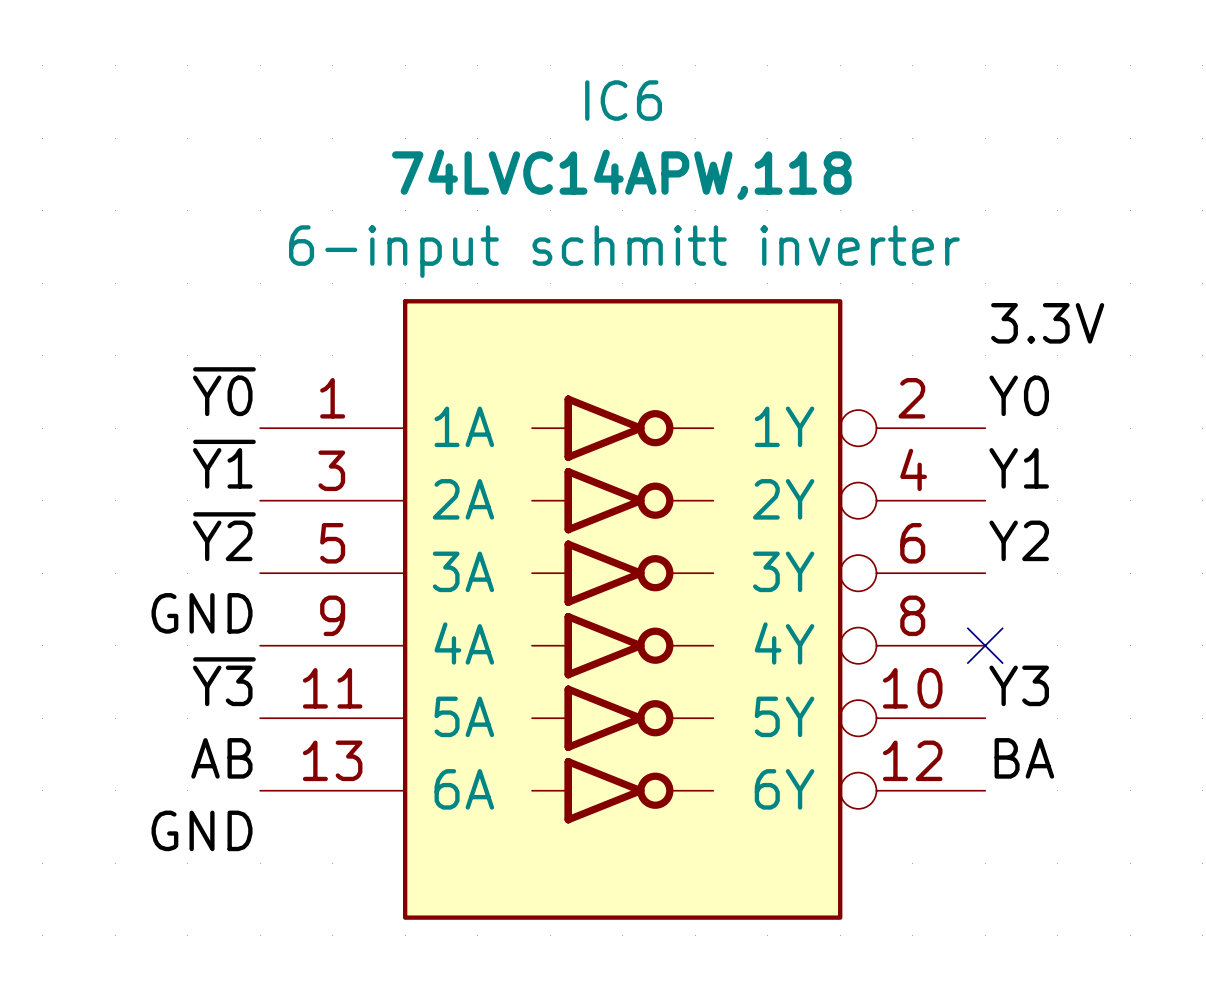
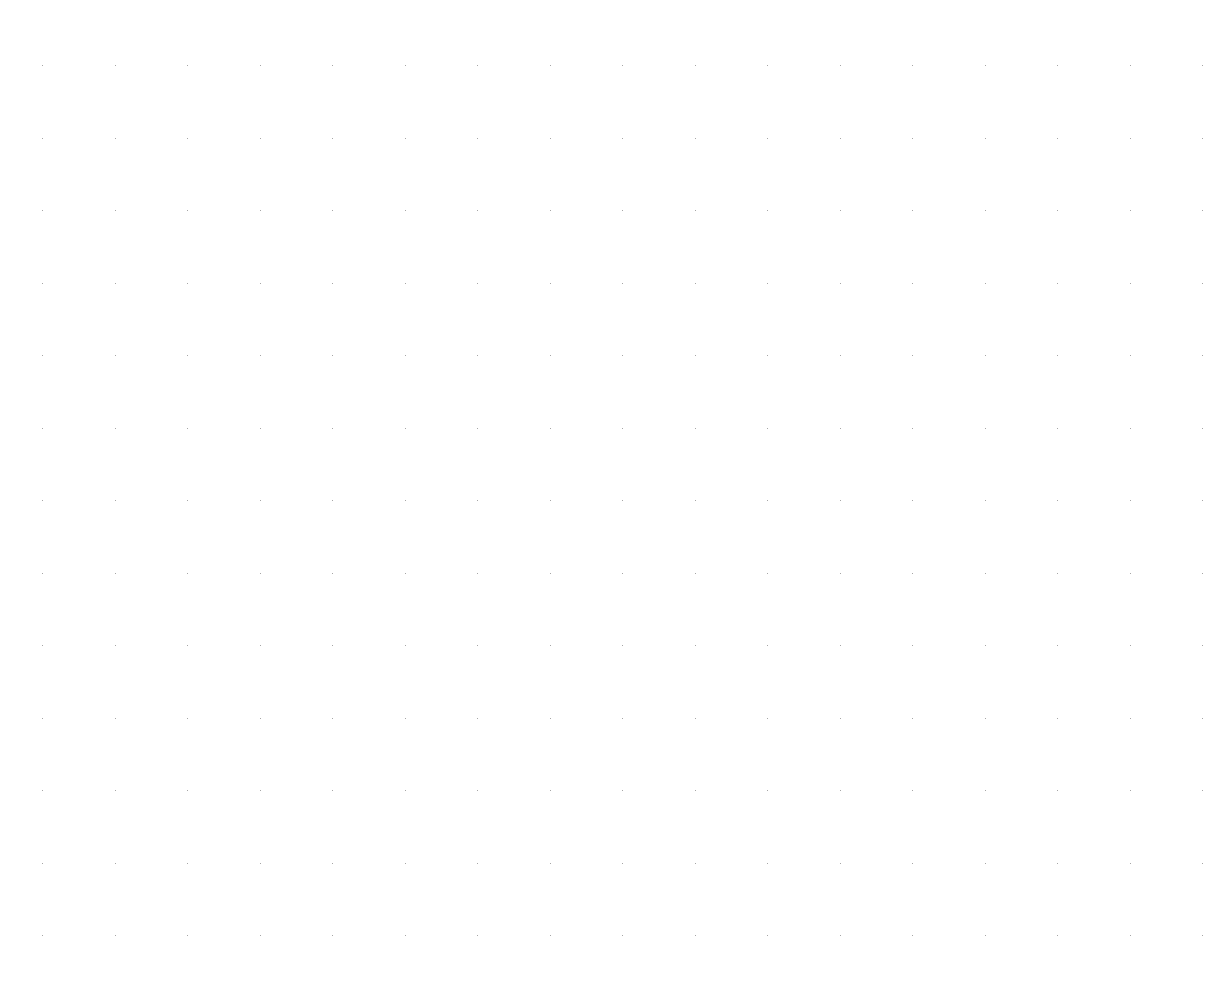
label: 3.3V (1047, 323) -> none
label: ~{Y0} (224, 391) -> none
label: Y0 (1019, 395) -> none
label: ~{Y1} (224, 464) -> none
label: Y1 (1019, 468) -> none
label: ~{Y2} (224, 536) -> none
label: Y2 (1019, 540) -> none
IC6: 74LVC14APW,118 (622, 609) -> none
label: GND (202, 613) -> none
no-connect mark: (985, 645) -> none
label: ~{Y3} (224, 681) -> none
label: Y3 (1019, 685) -> none
label: AB (221, 758) -> none
label: BA (1024, 758) -> none
label: GND (202, 830) -> none

